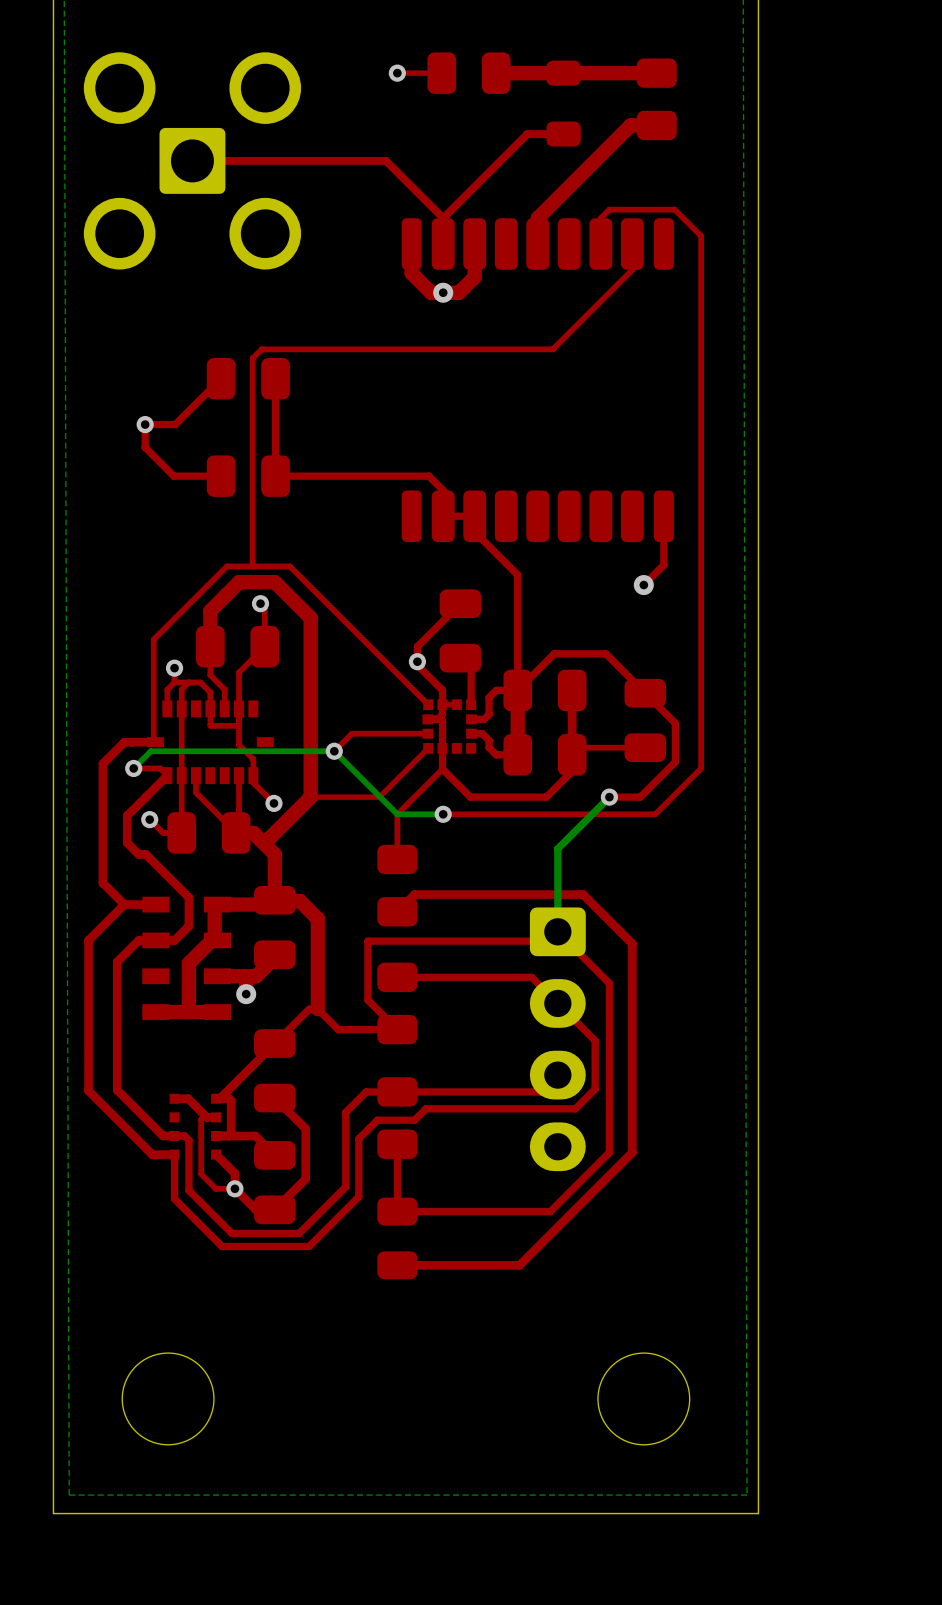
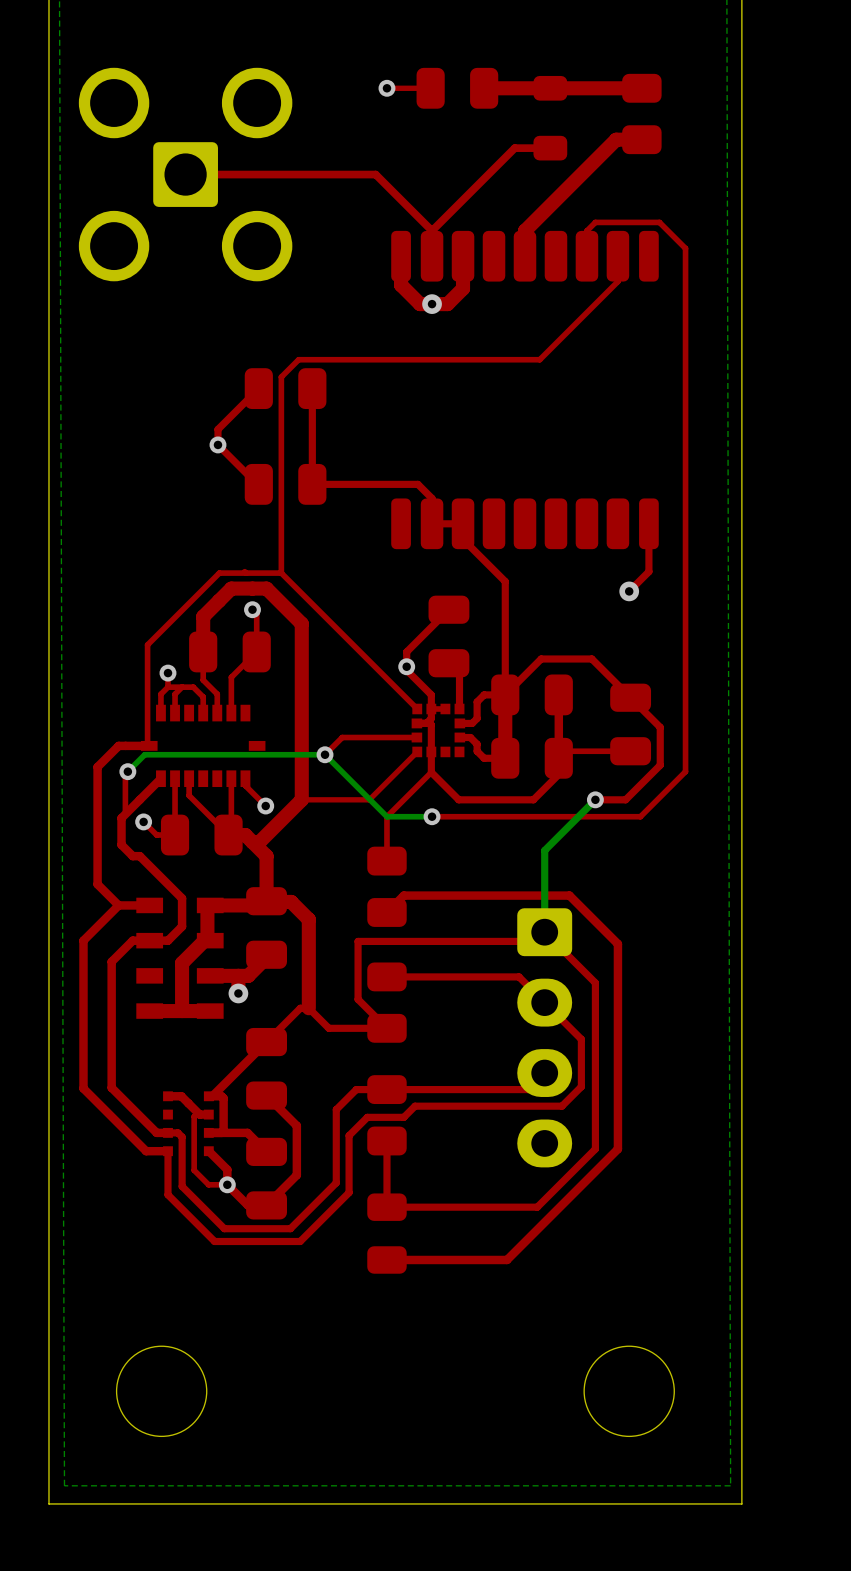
top track: (307, 349) (261, 349) (252, 358) (252, 564) -> (298, 359) (281, 377) (281, 573)
top track: (221, 378) (175, 424) (145, 424) (145, 447) (173, 476) (221, 476) -> none
part position: (248, 378) -> (285, 388)
top track: none -> (258, 388) (217, 429) (217, 444) (258, 484)
top track: (275, 378) (275, 476) (321, 476) -> (312, 388) (312, 484)
via position: (145, 424) -> (217, 444)
part position: (248, 476) -> (285, 484)
top track: (181, 708) (181, 775) -> none
top track: (210, 708) (211, 725) (239, 725) -> none
top track: (239, 708) (239, 744) (253, 759) (253, 775) -> none
top track: (133, 768) (160, 768) (167, 775) -> (127, 771) (125, 774) (125, 814) (121, 818)

